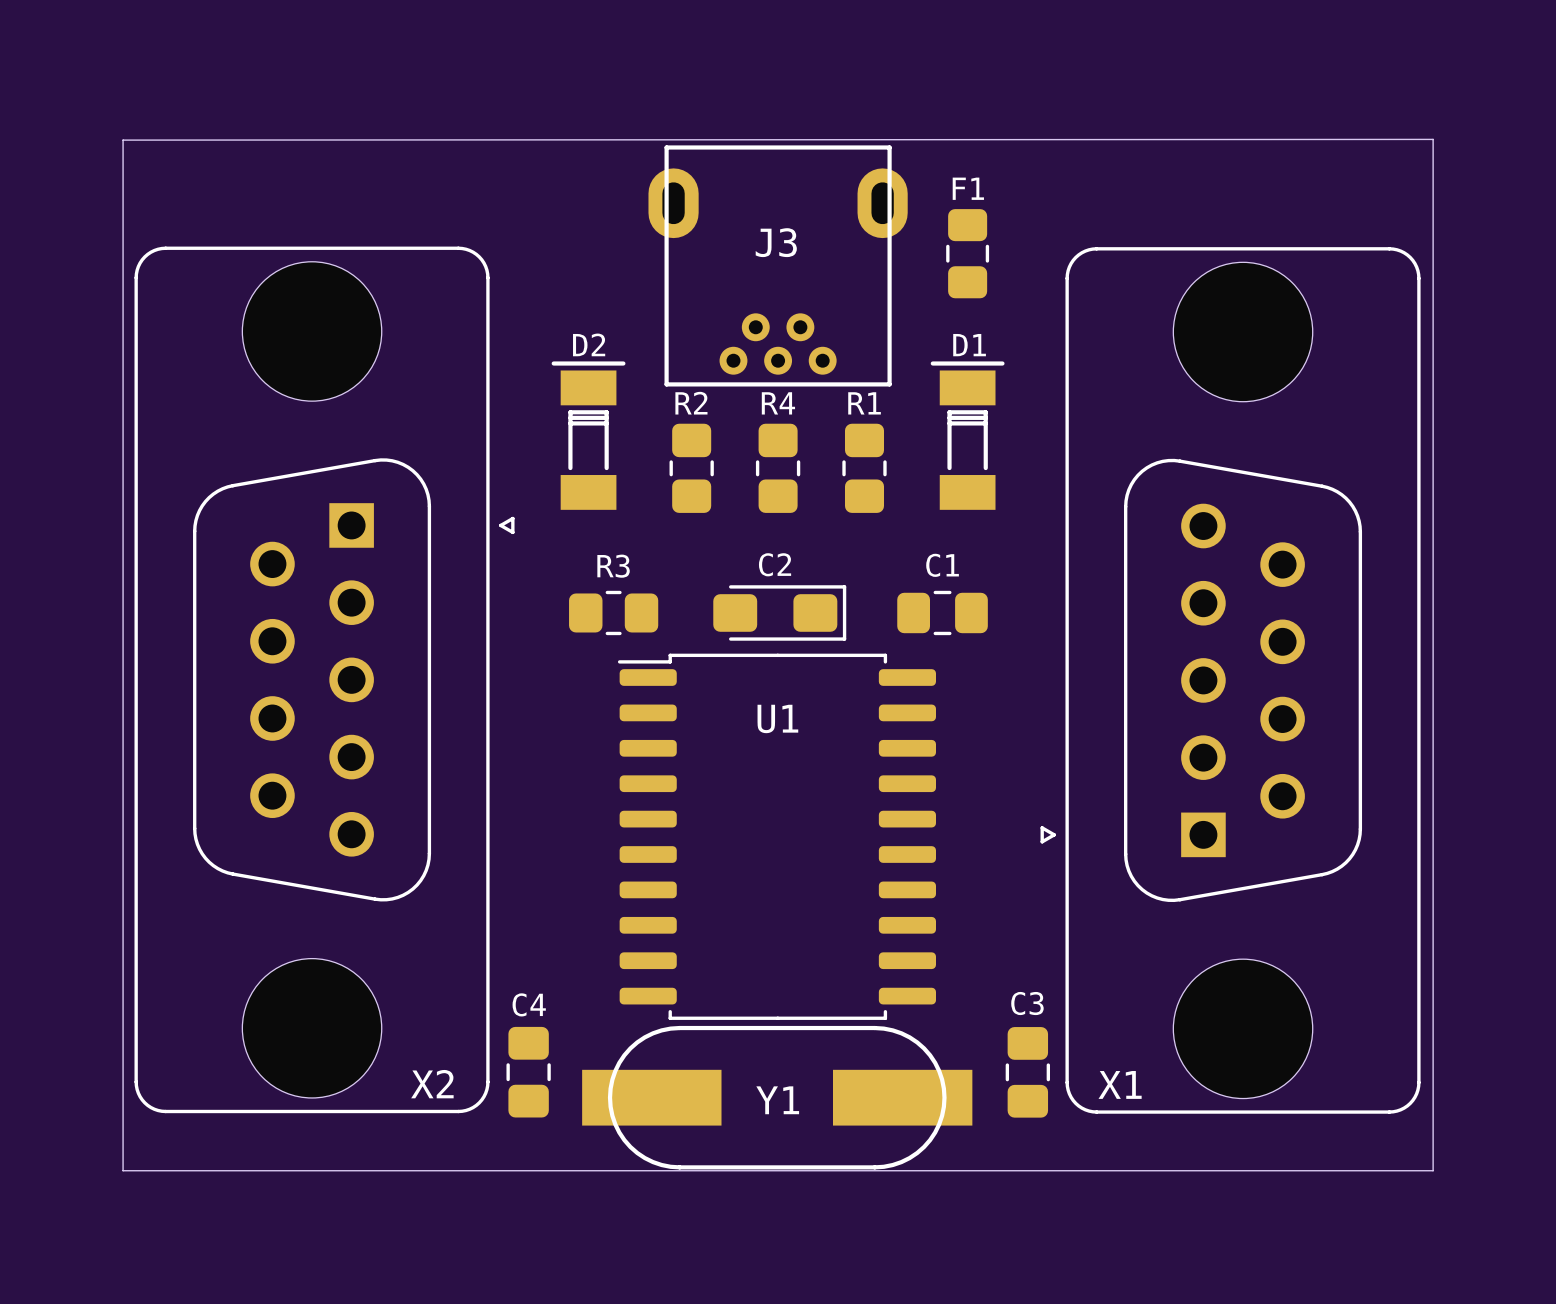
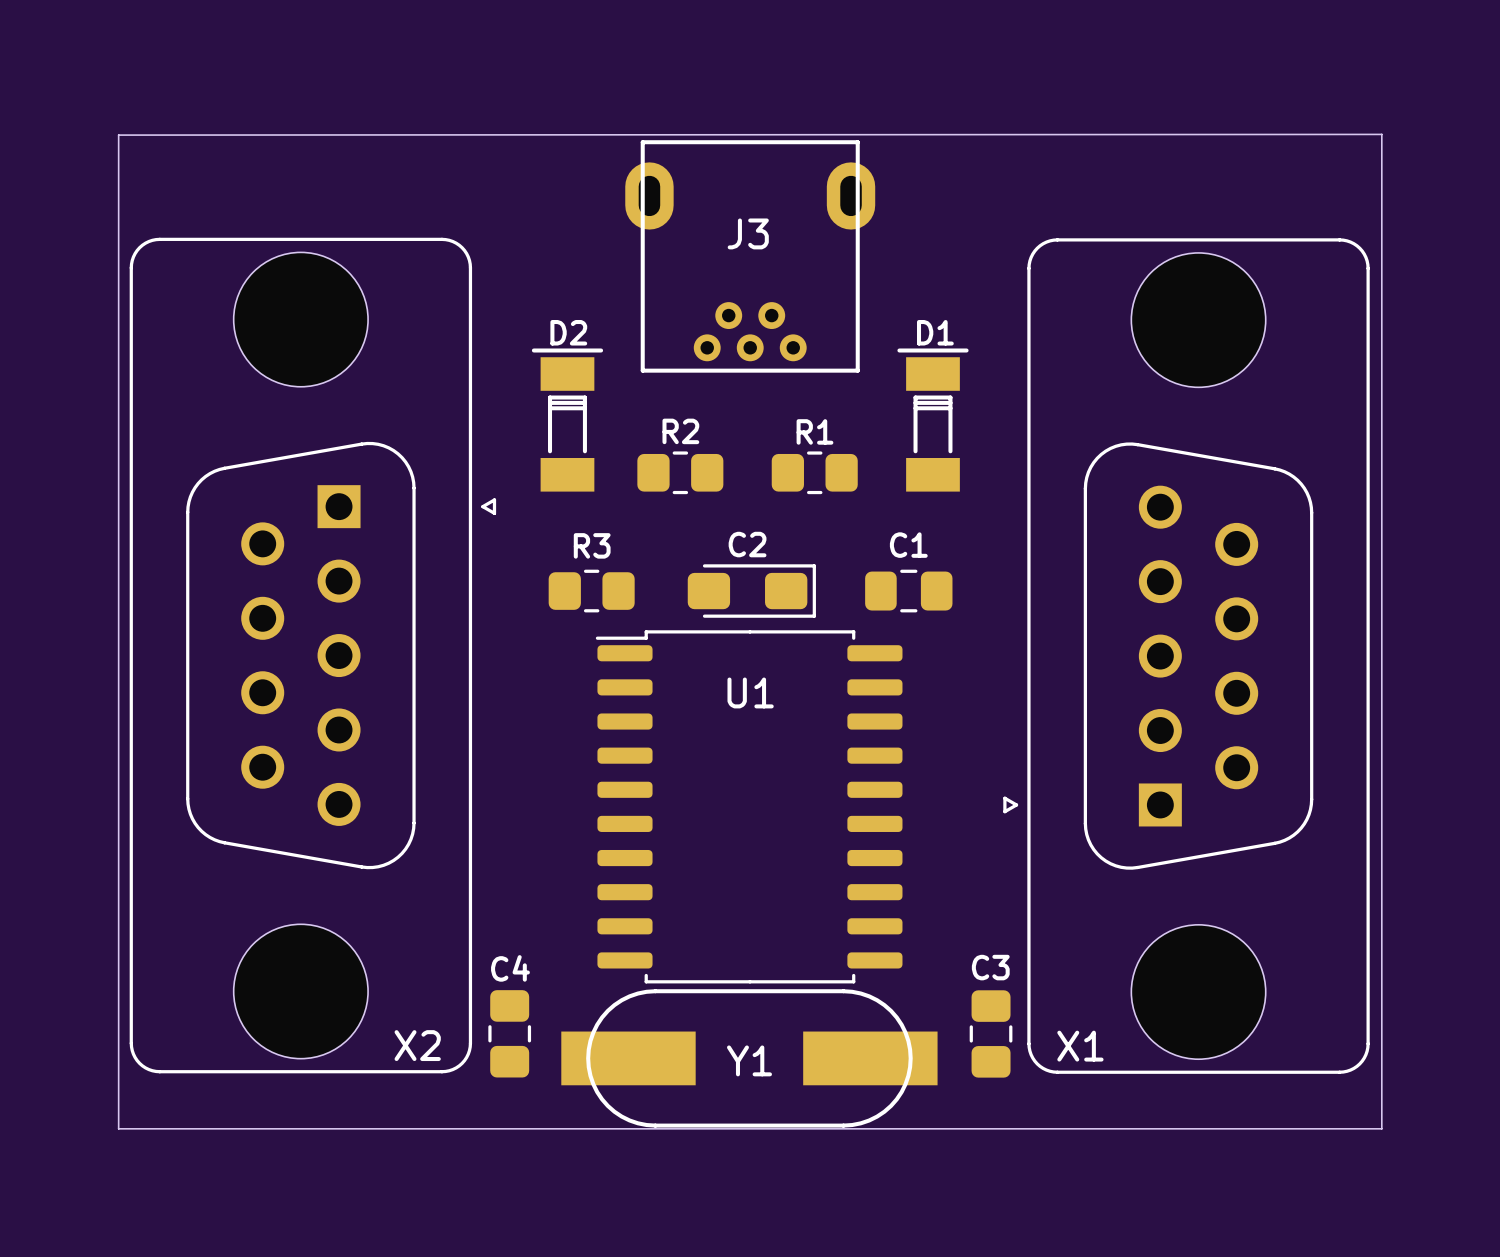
F1: (967, 253) -> none
R2 rotation: 0° (691, 468) -> 90° clockwise (680, 472)
R4: (778, 468) -> none
R1 rotation: 0° (864, 468) -> 90° clockwise (814, 472)

